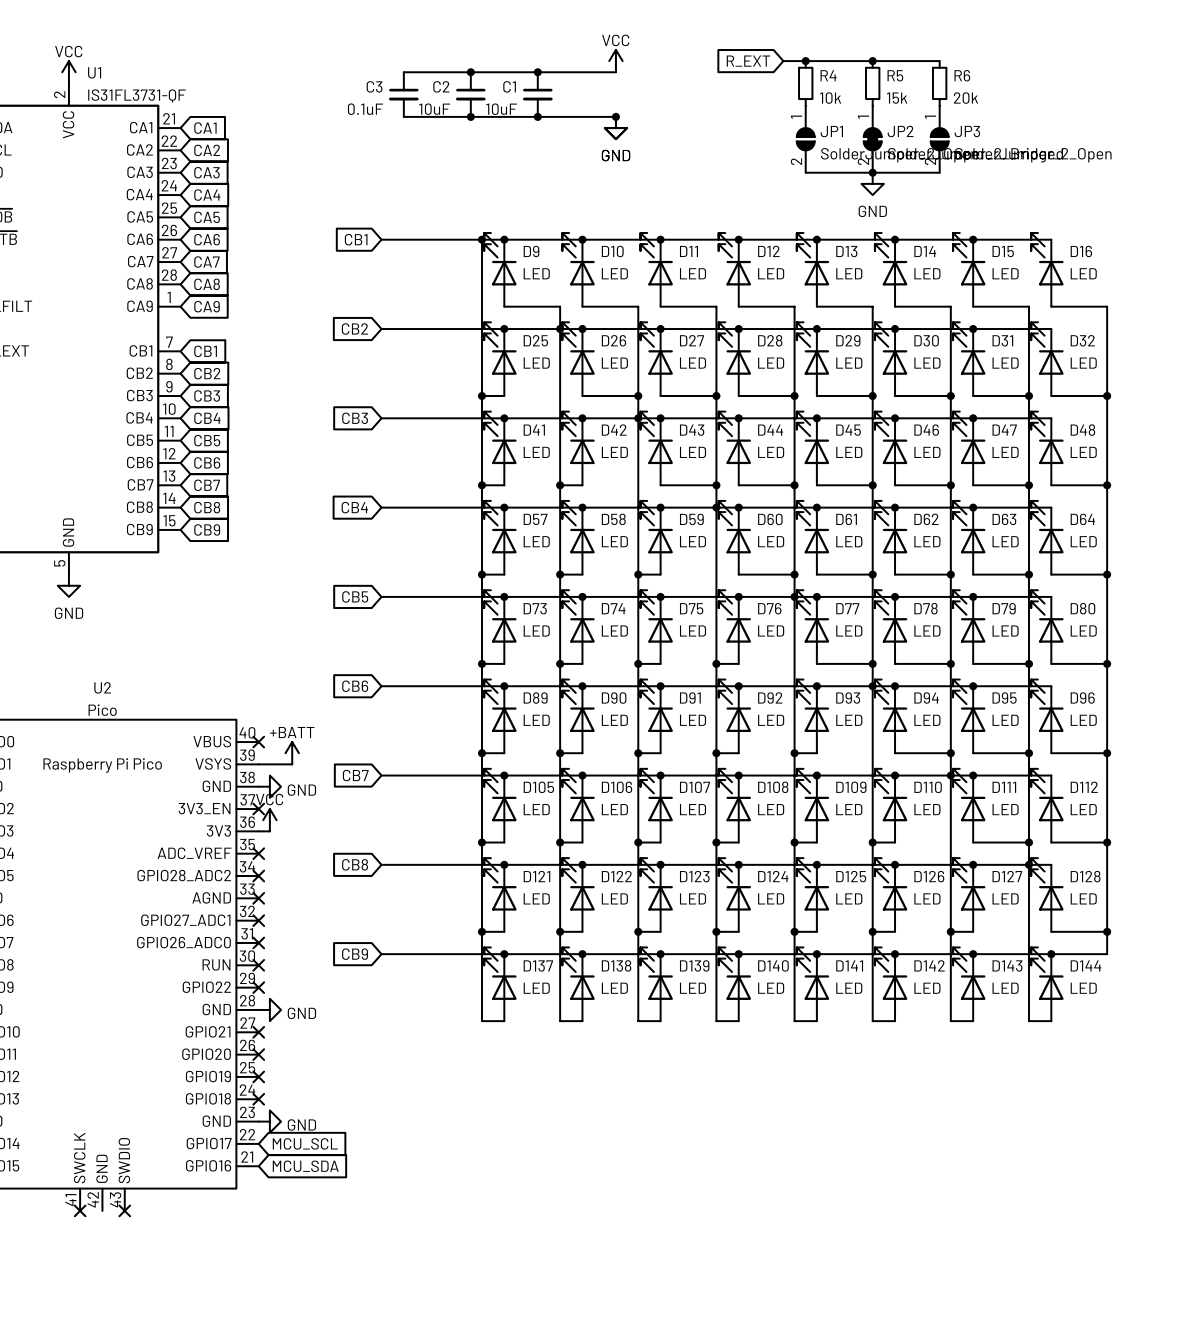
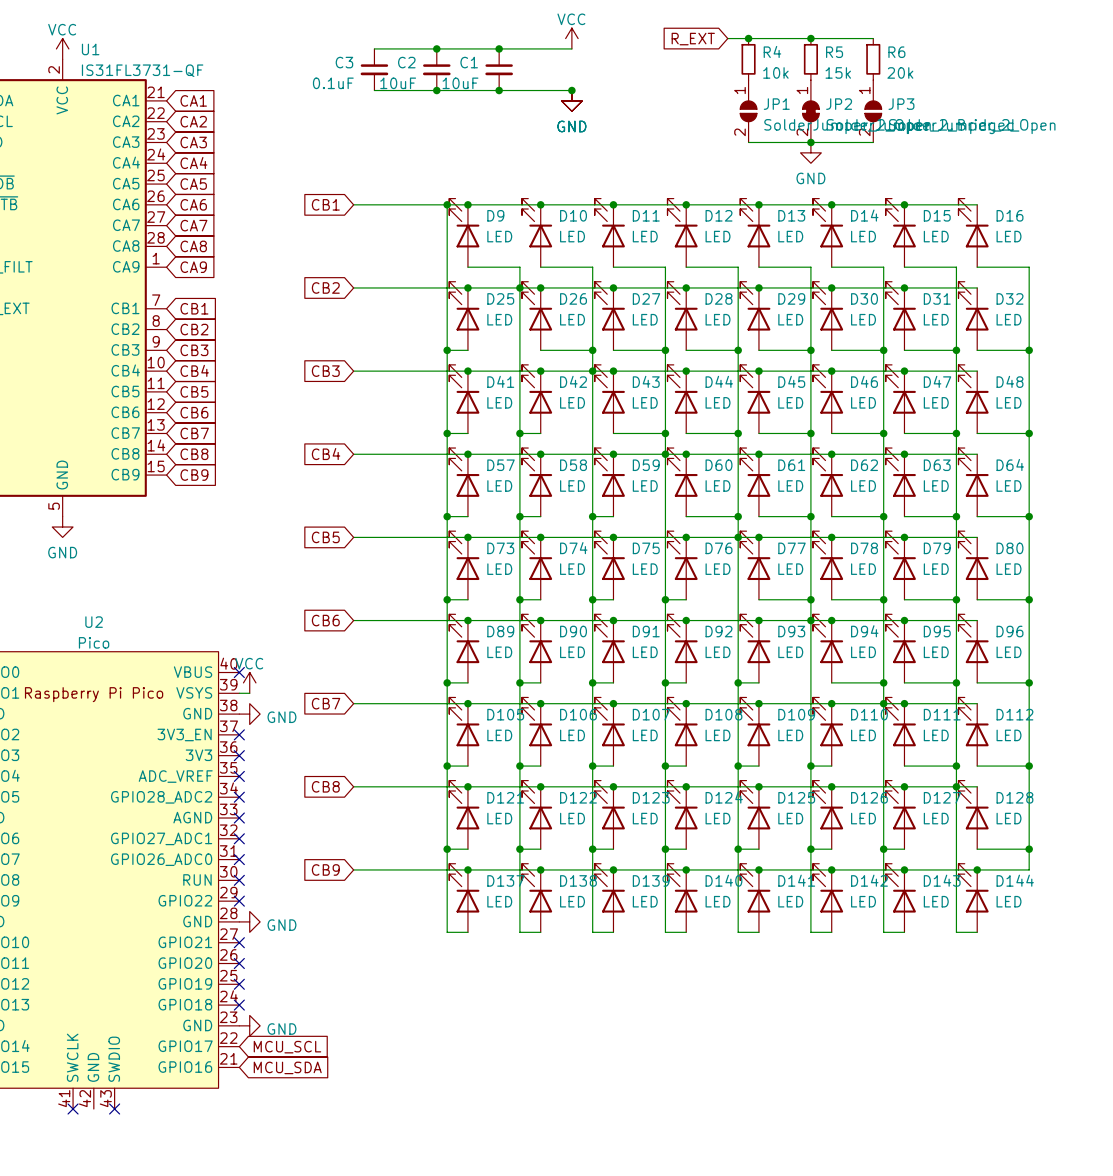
power symbol: +BATT (292, 753) -> none
wire: (269, 764) (292, 764) -> none
power symbol position: VCC (269, 820) -> VCC (249, 682)
wire: (258, 831) (269, 831) -> none
no-connect mark: none -> (239, 755)

